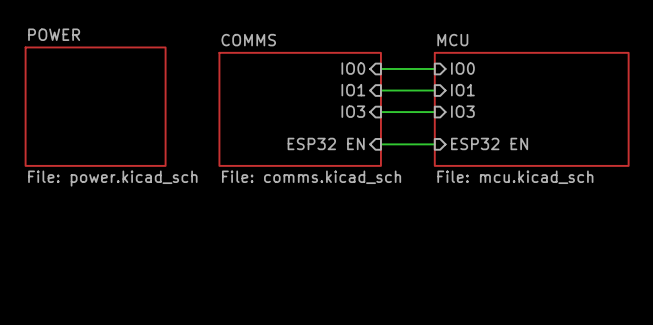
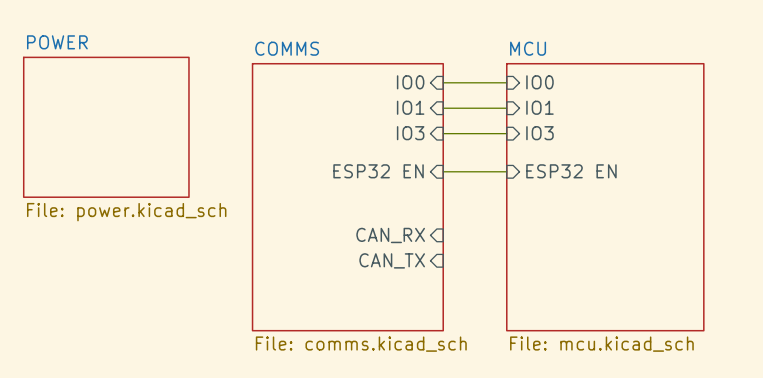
sheet COMMS: File: comms.kicad_sch (300, 109) -> none
sheet MCU: File: mcu.kicad_sch (531, 109) -> none
sheet COMMS: none -> File: comms.kicad_sch (347, 197)
sheet MCU: none -> File: mcu.kicad_sch (605, 197)
sheet pin: none -> CAN_RX (390, 235)
sheet pin: none -> CAN_TX (392, 260)

